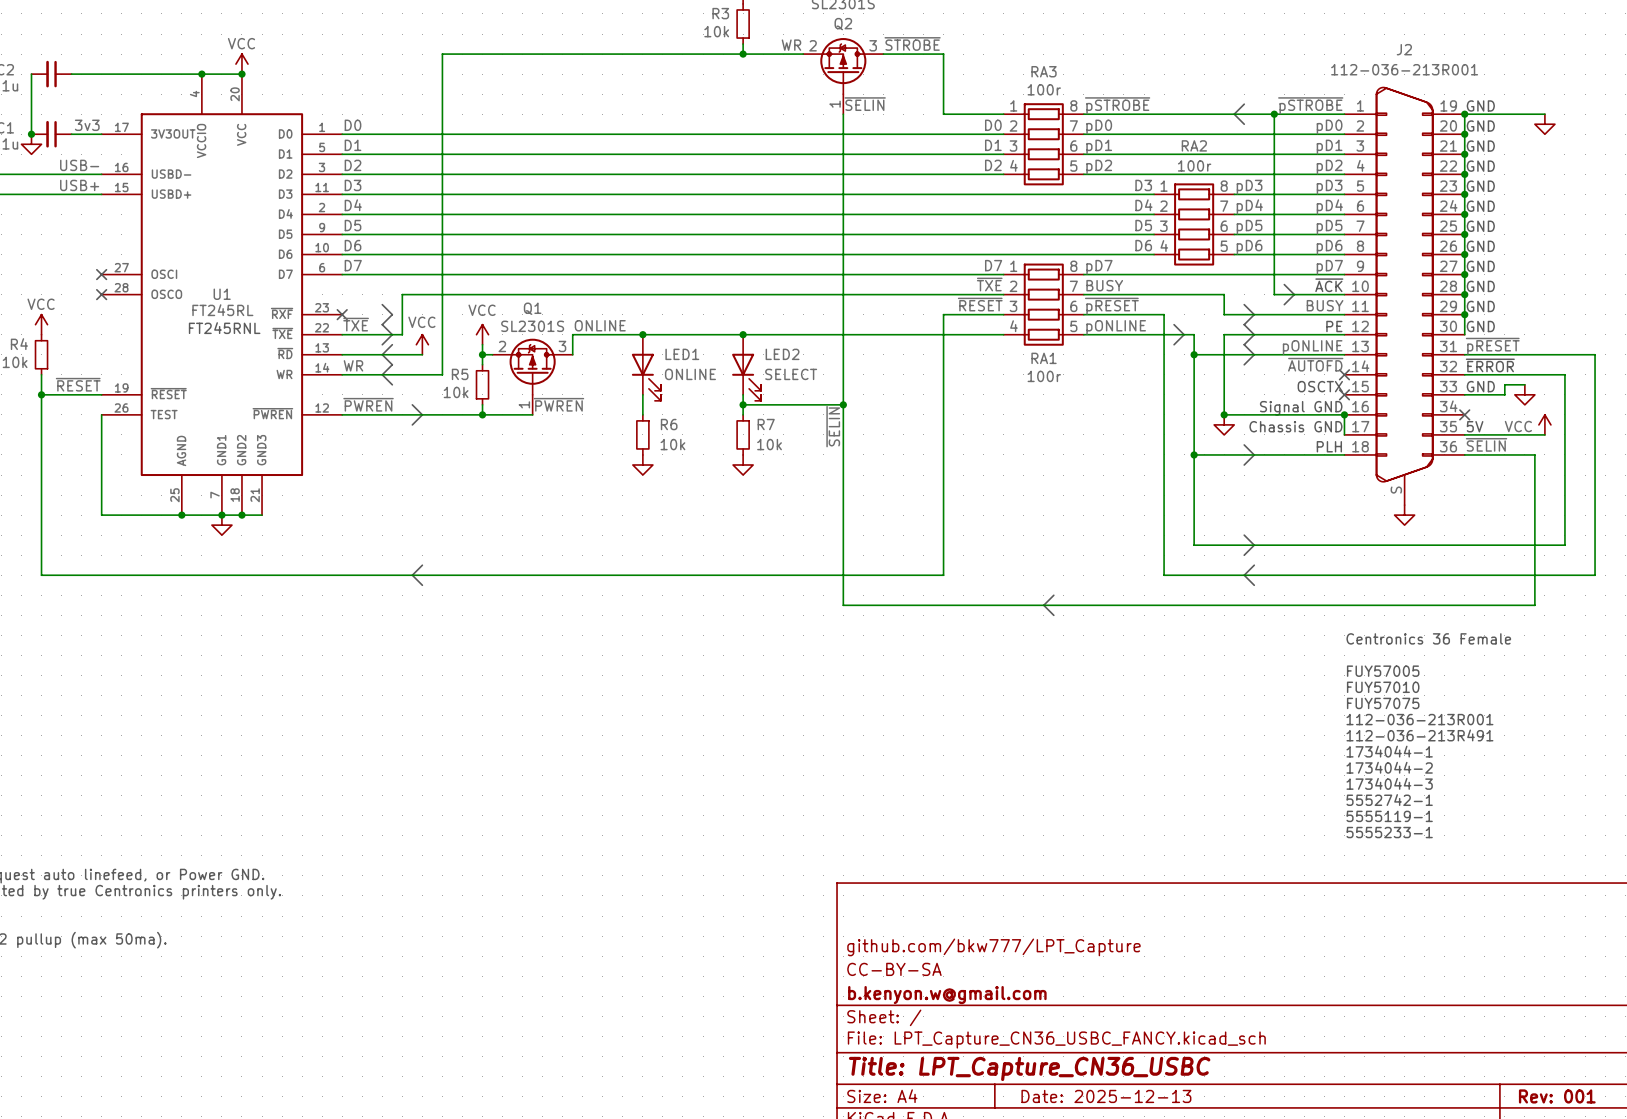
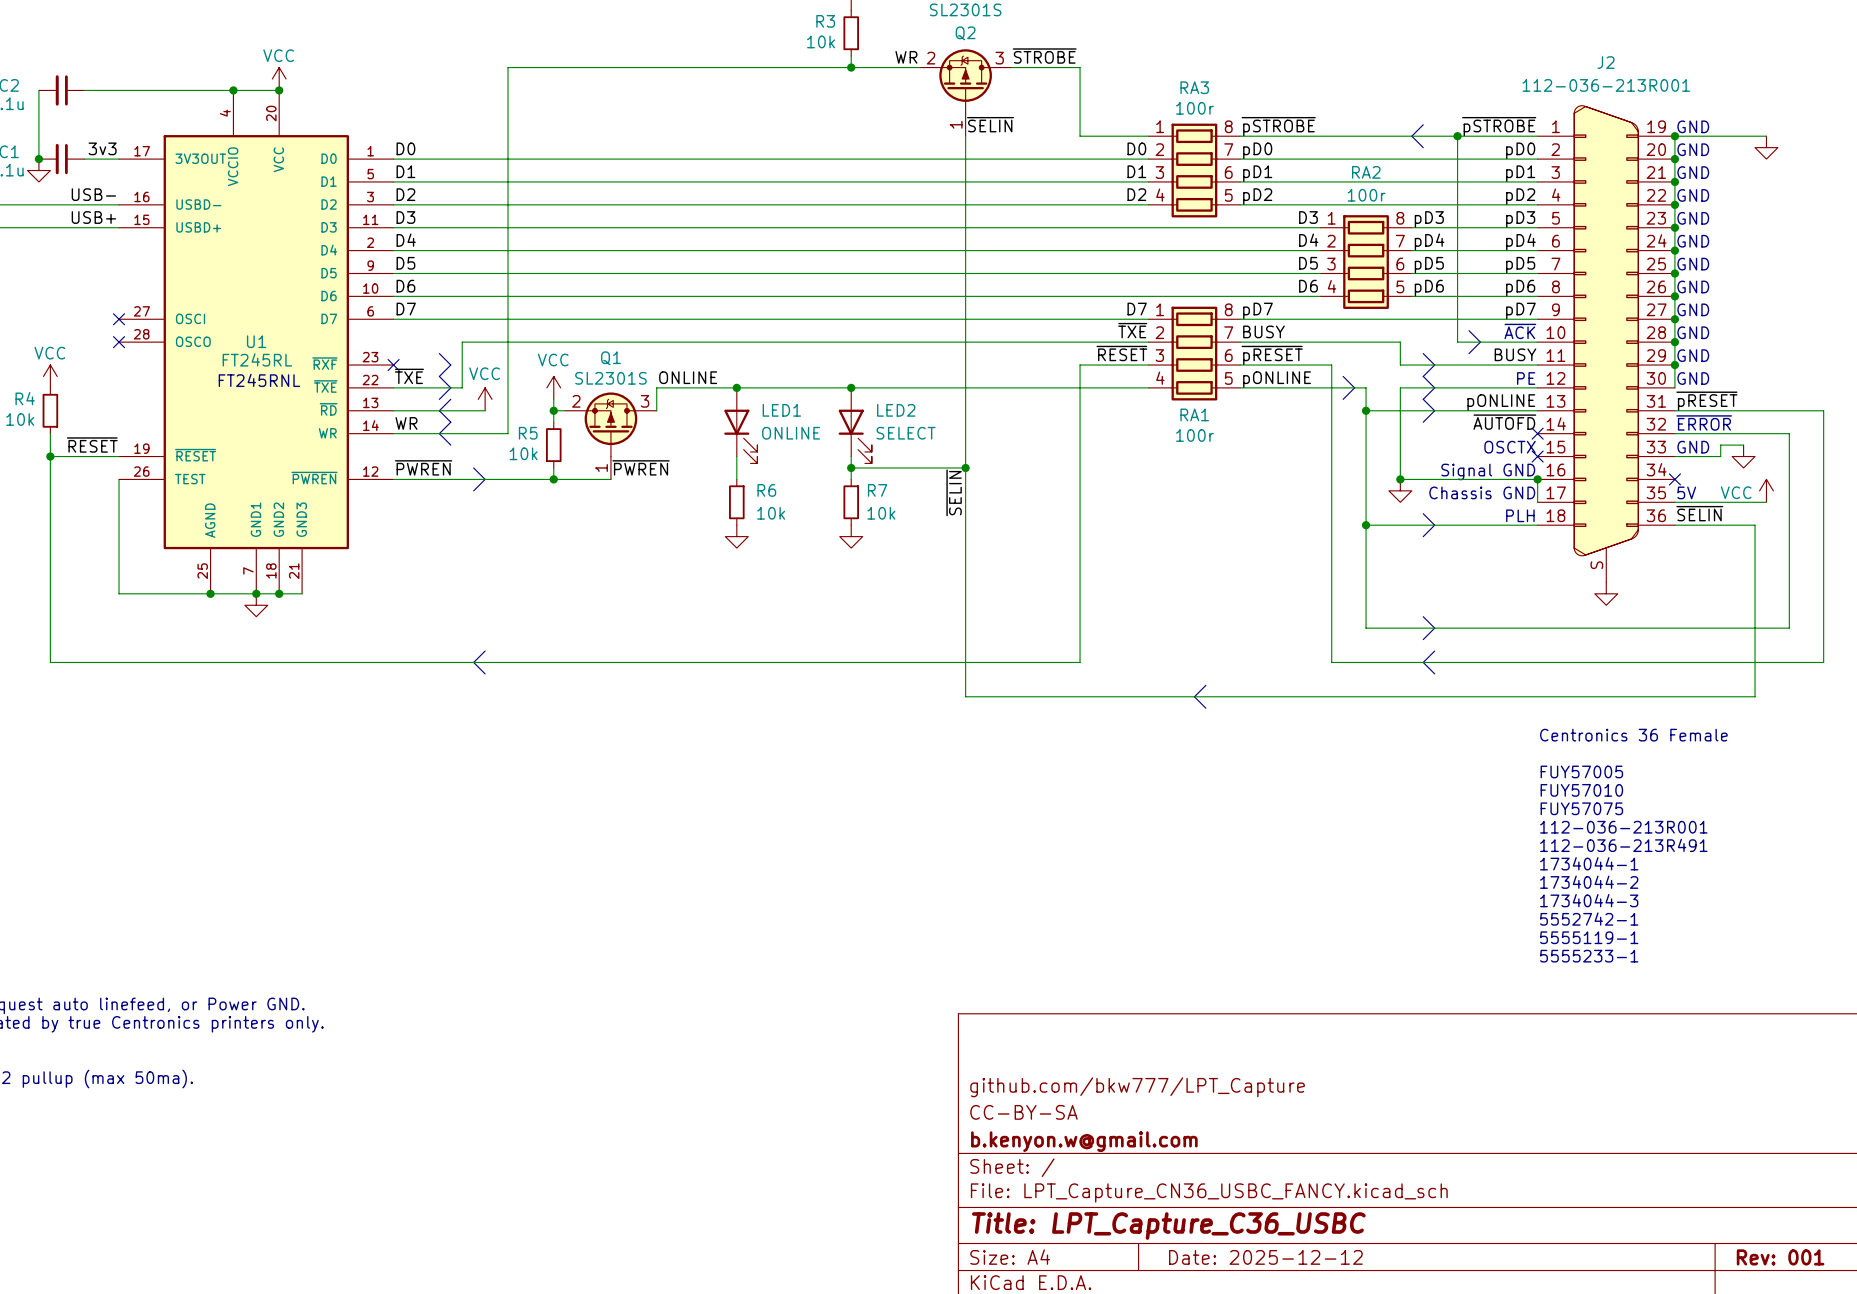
title block: Title: LPT_Capture_CN36_USBC (1029, 1068) -> Title: LPT_Capture_C36_USBC (1168, 1226)
title block: Date: 2025-12-13 (1106, 1096) -> Date: 2025-12-12 (1265, 1257)

